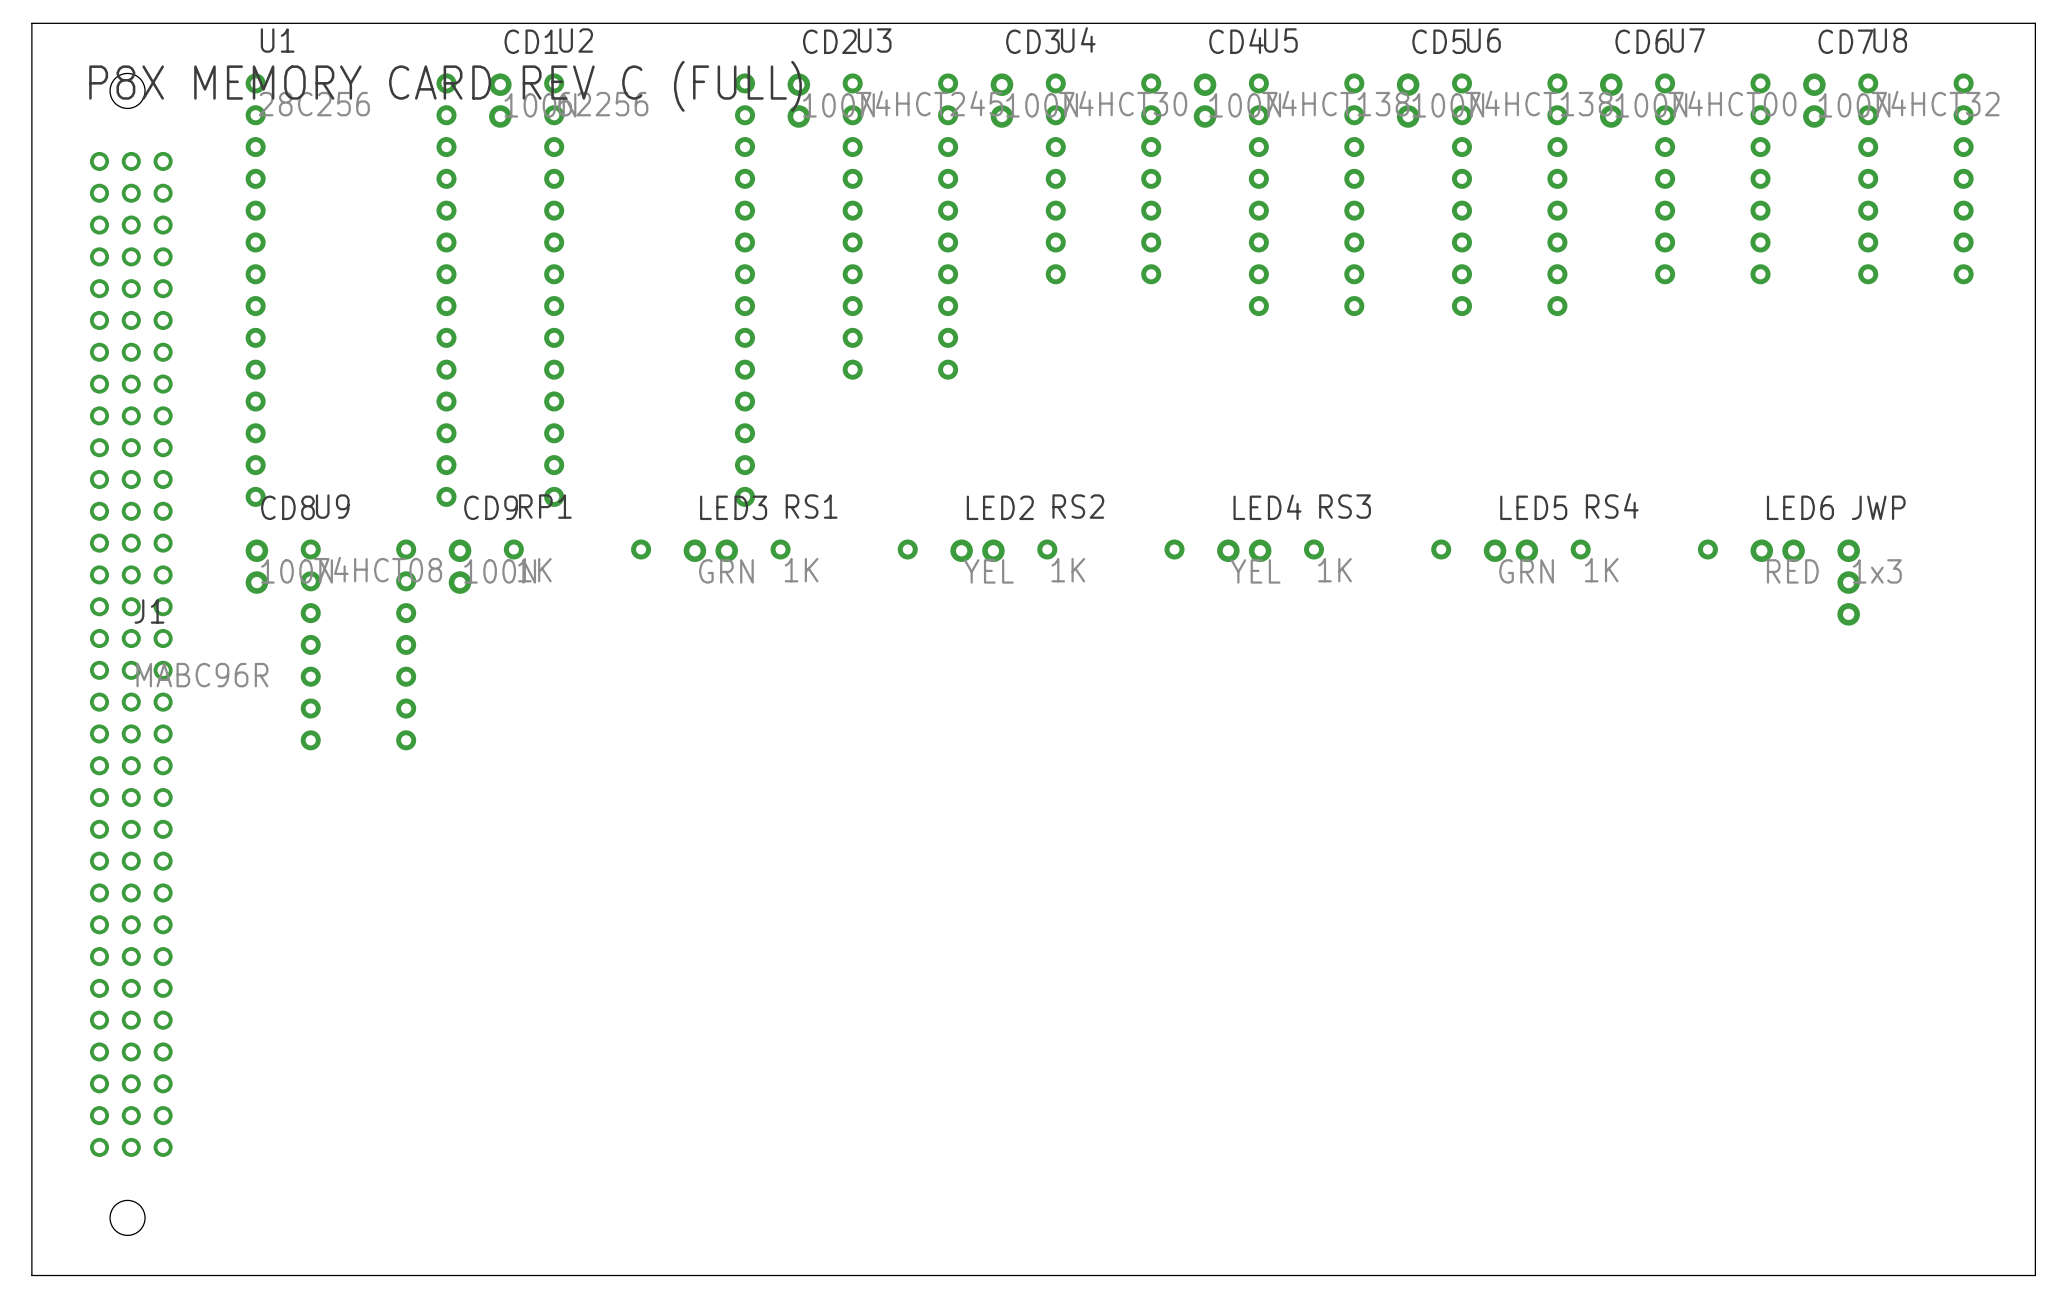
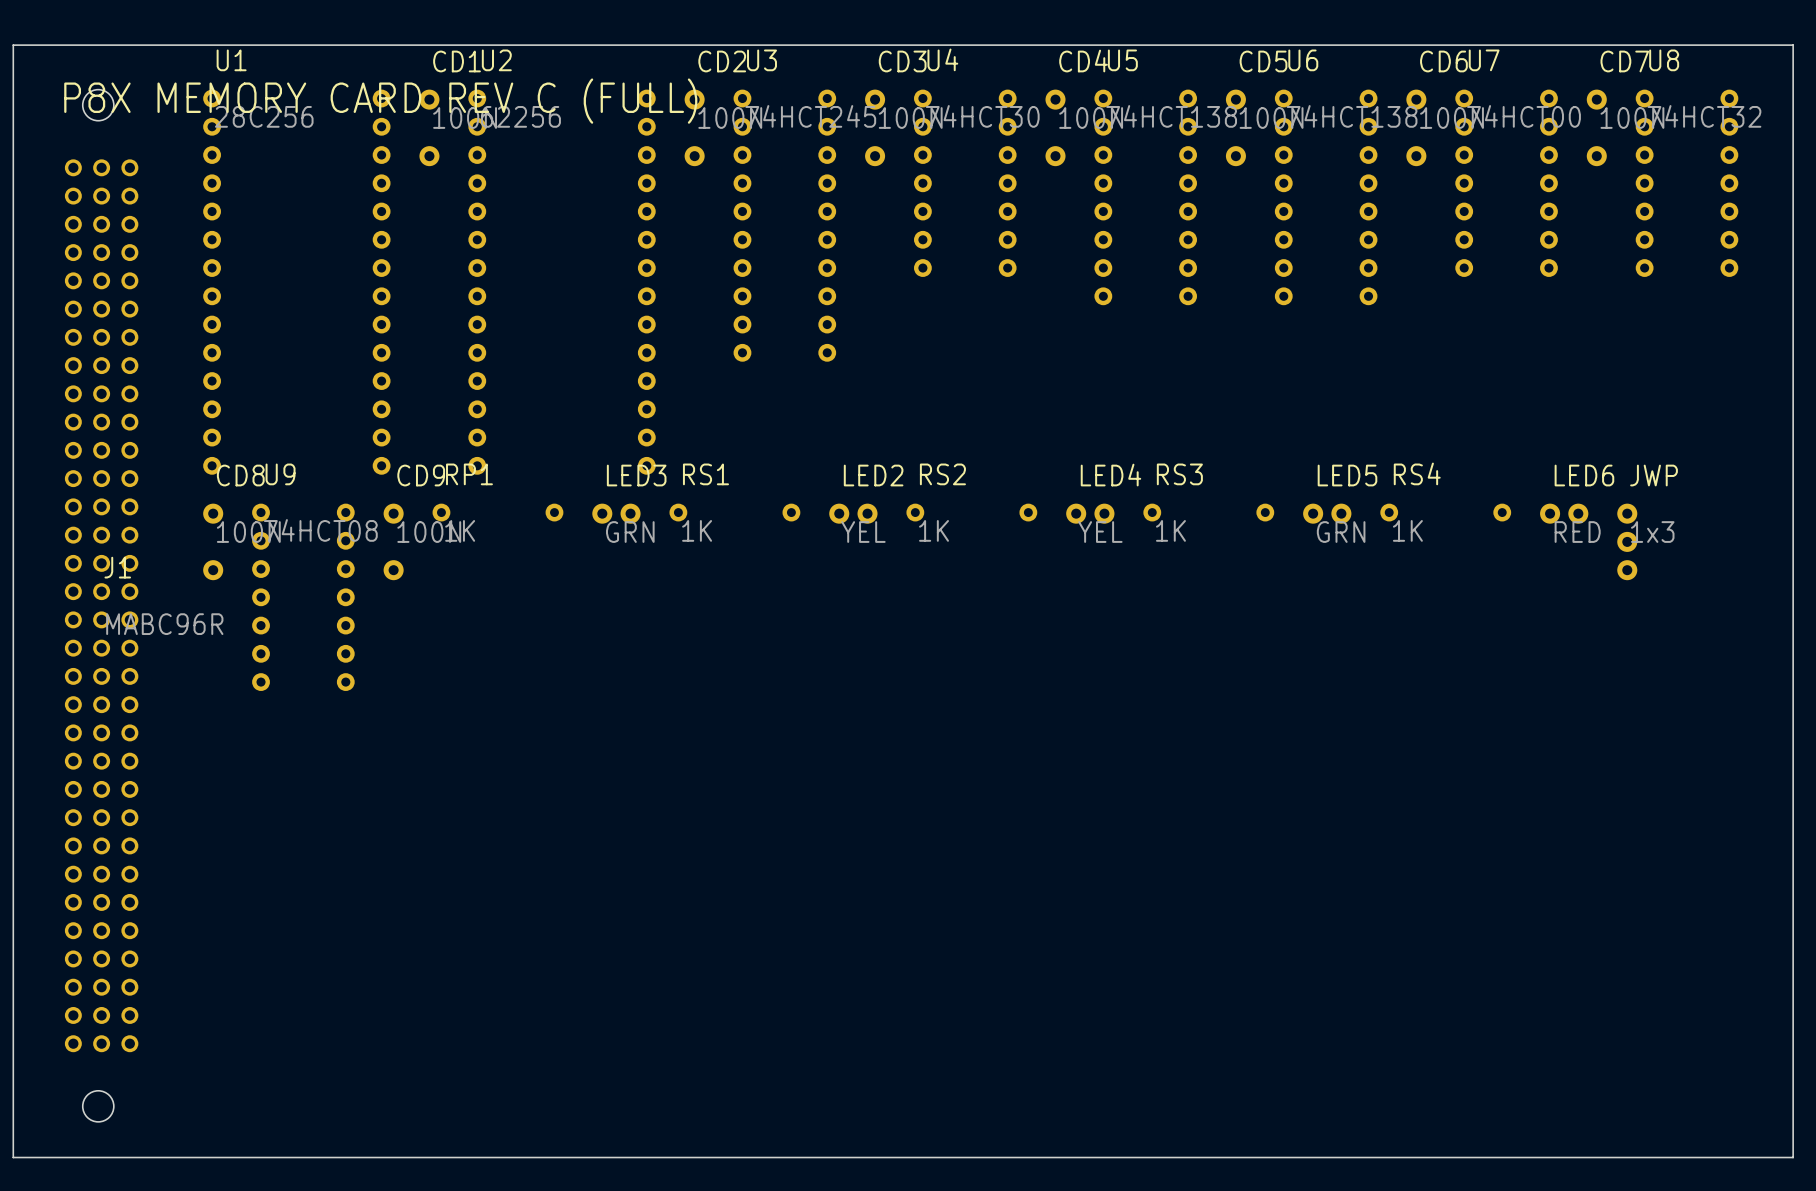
CD1 footprint: [489, 73, 512, 128] -> [419, 89, 440, 167]
CD2 footprint: [787, 73, 811, 128] -> [684, 89, 705, 167]
CD3 footprint: [990, 73, 1014, 128] -> [865, 89, 886, 167]
CD4 footprint: [1193, 73, 1217, 128] -> [1045, 89, 1066, 167]
CD5 footprint: [1396, 73, 1420, 128] -> [1225, 89, 1246, 167]
CD6 footprint: [1599, 73, 1623, 128] -> [1406, 89, 1427, 167]
CD7 footprint: [1803, 73, 1826, 128] -> [1586, 89, 1607, 167]
CD8 footprint: [245, 539, 269, 594] -> [203, 503, 224, 581]
CD9 footprint: [448, 539, 472, 594] -> [383, 503, 404, 581]

